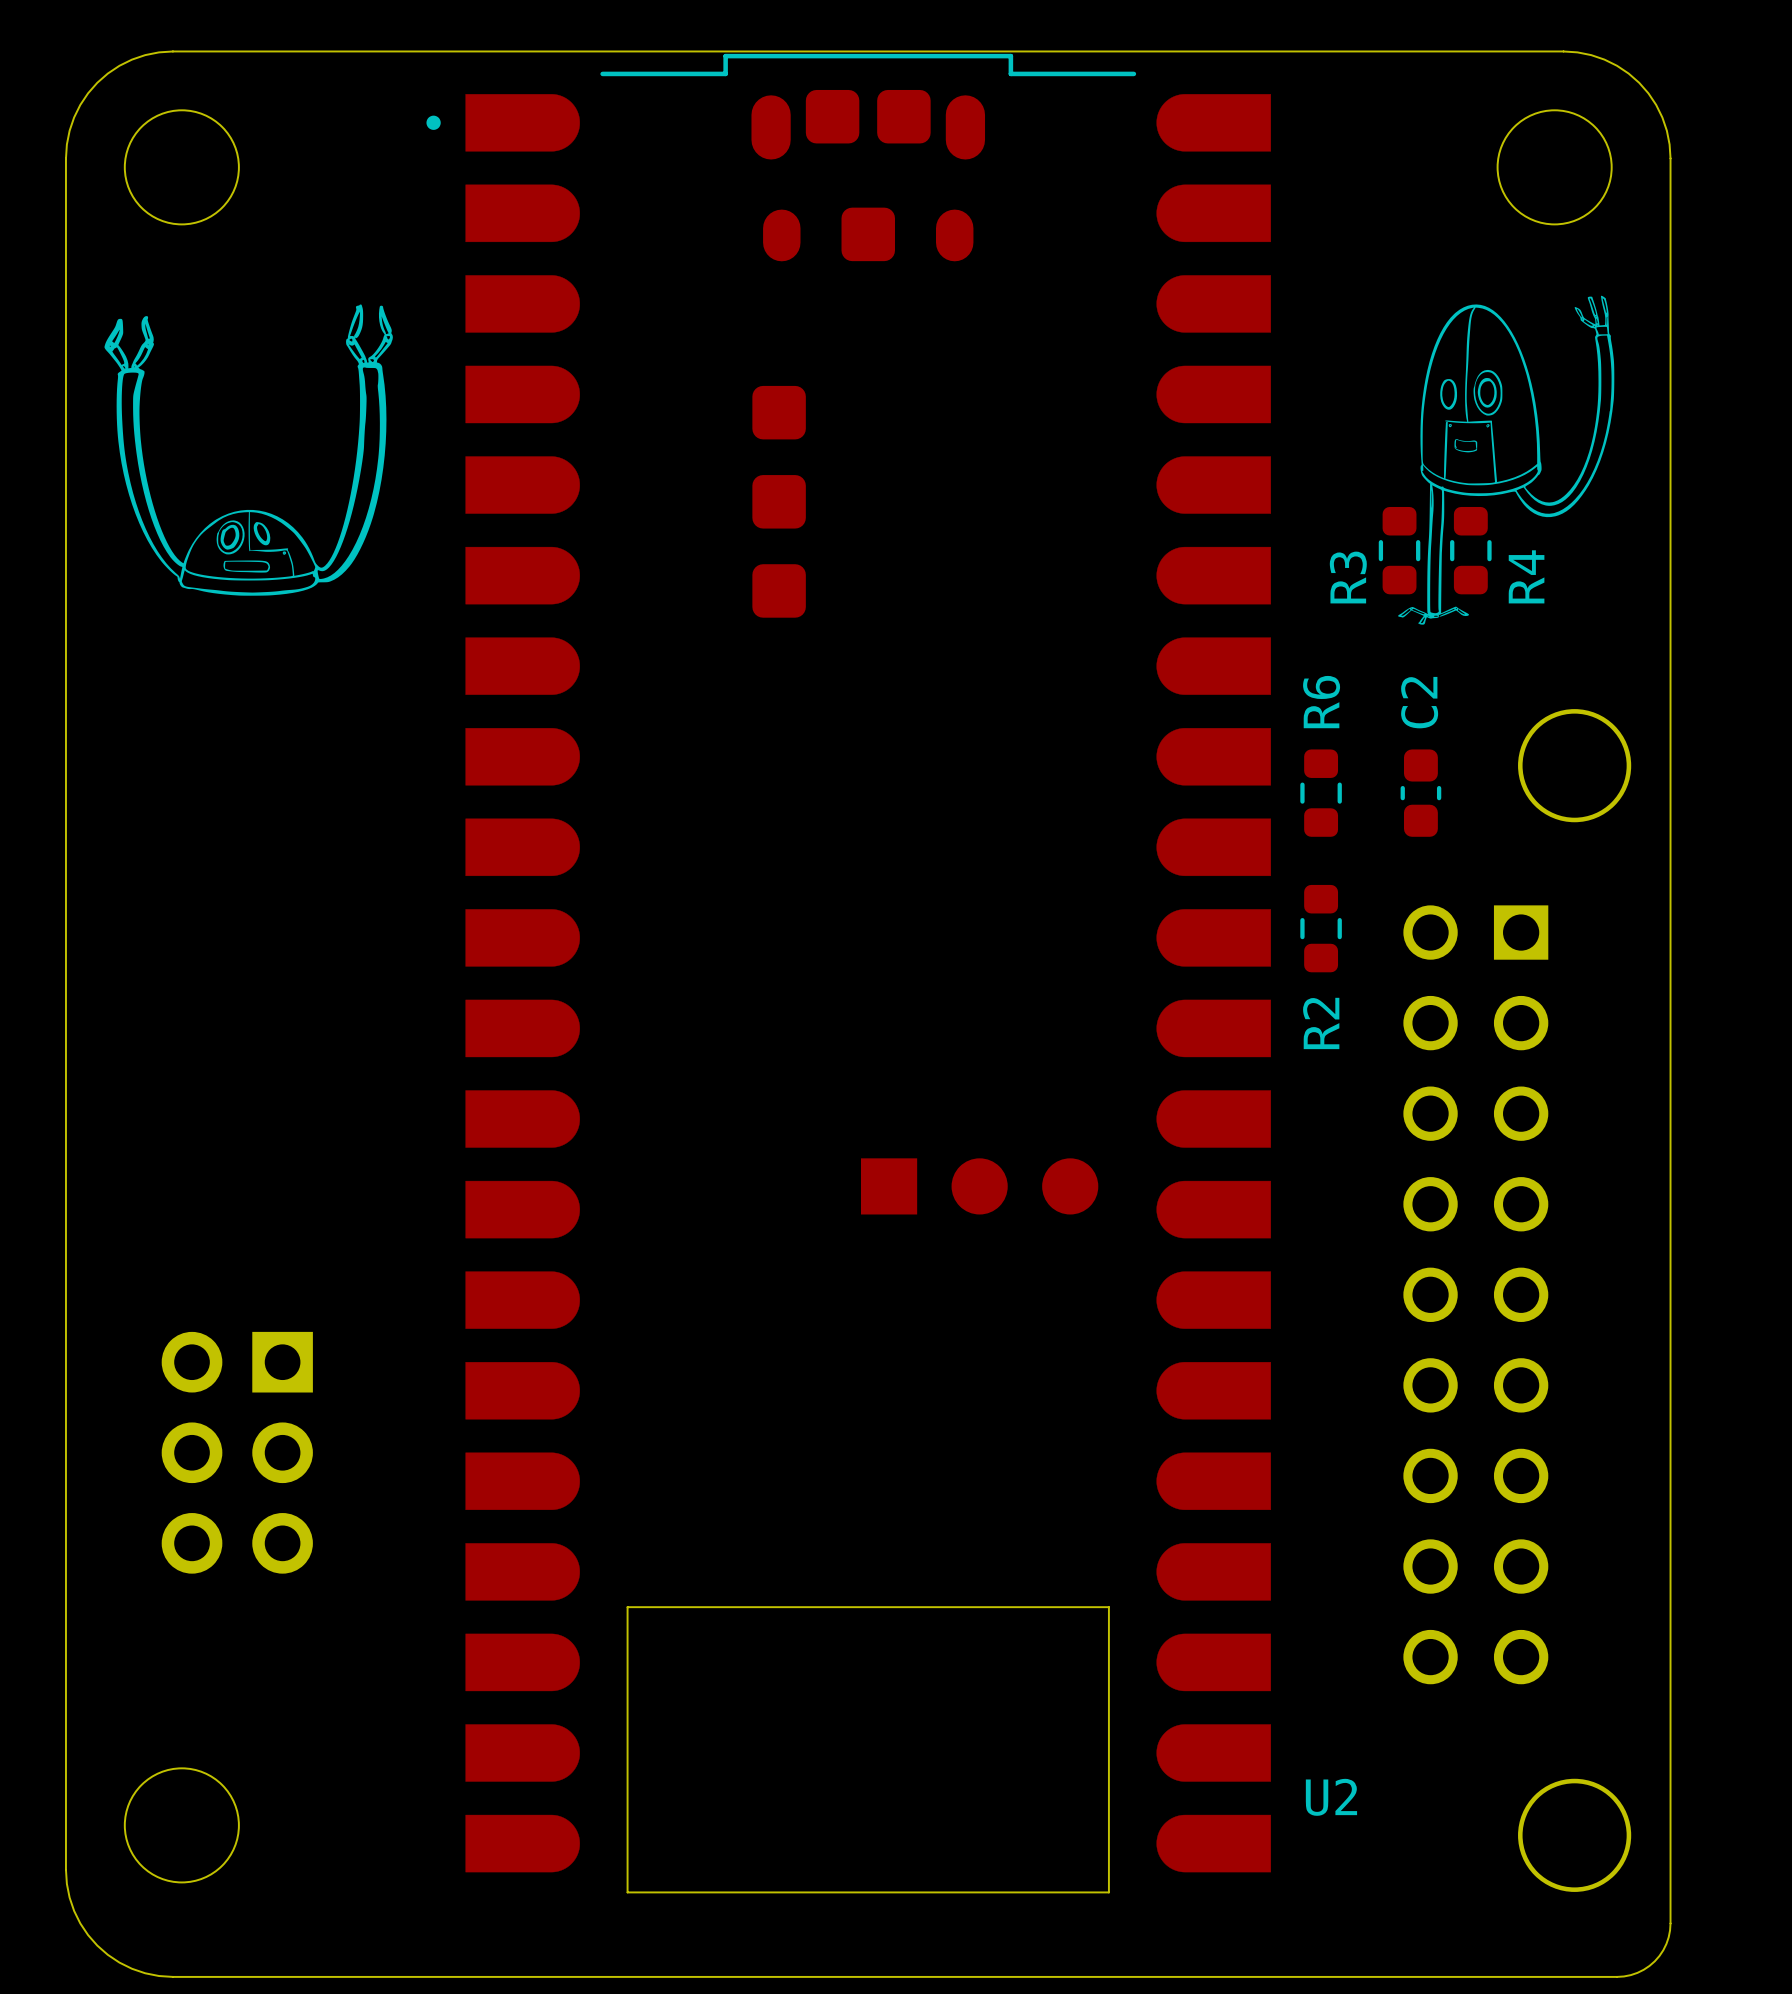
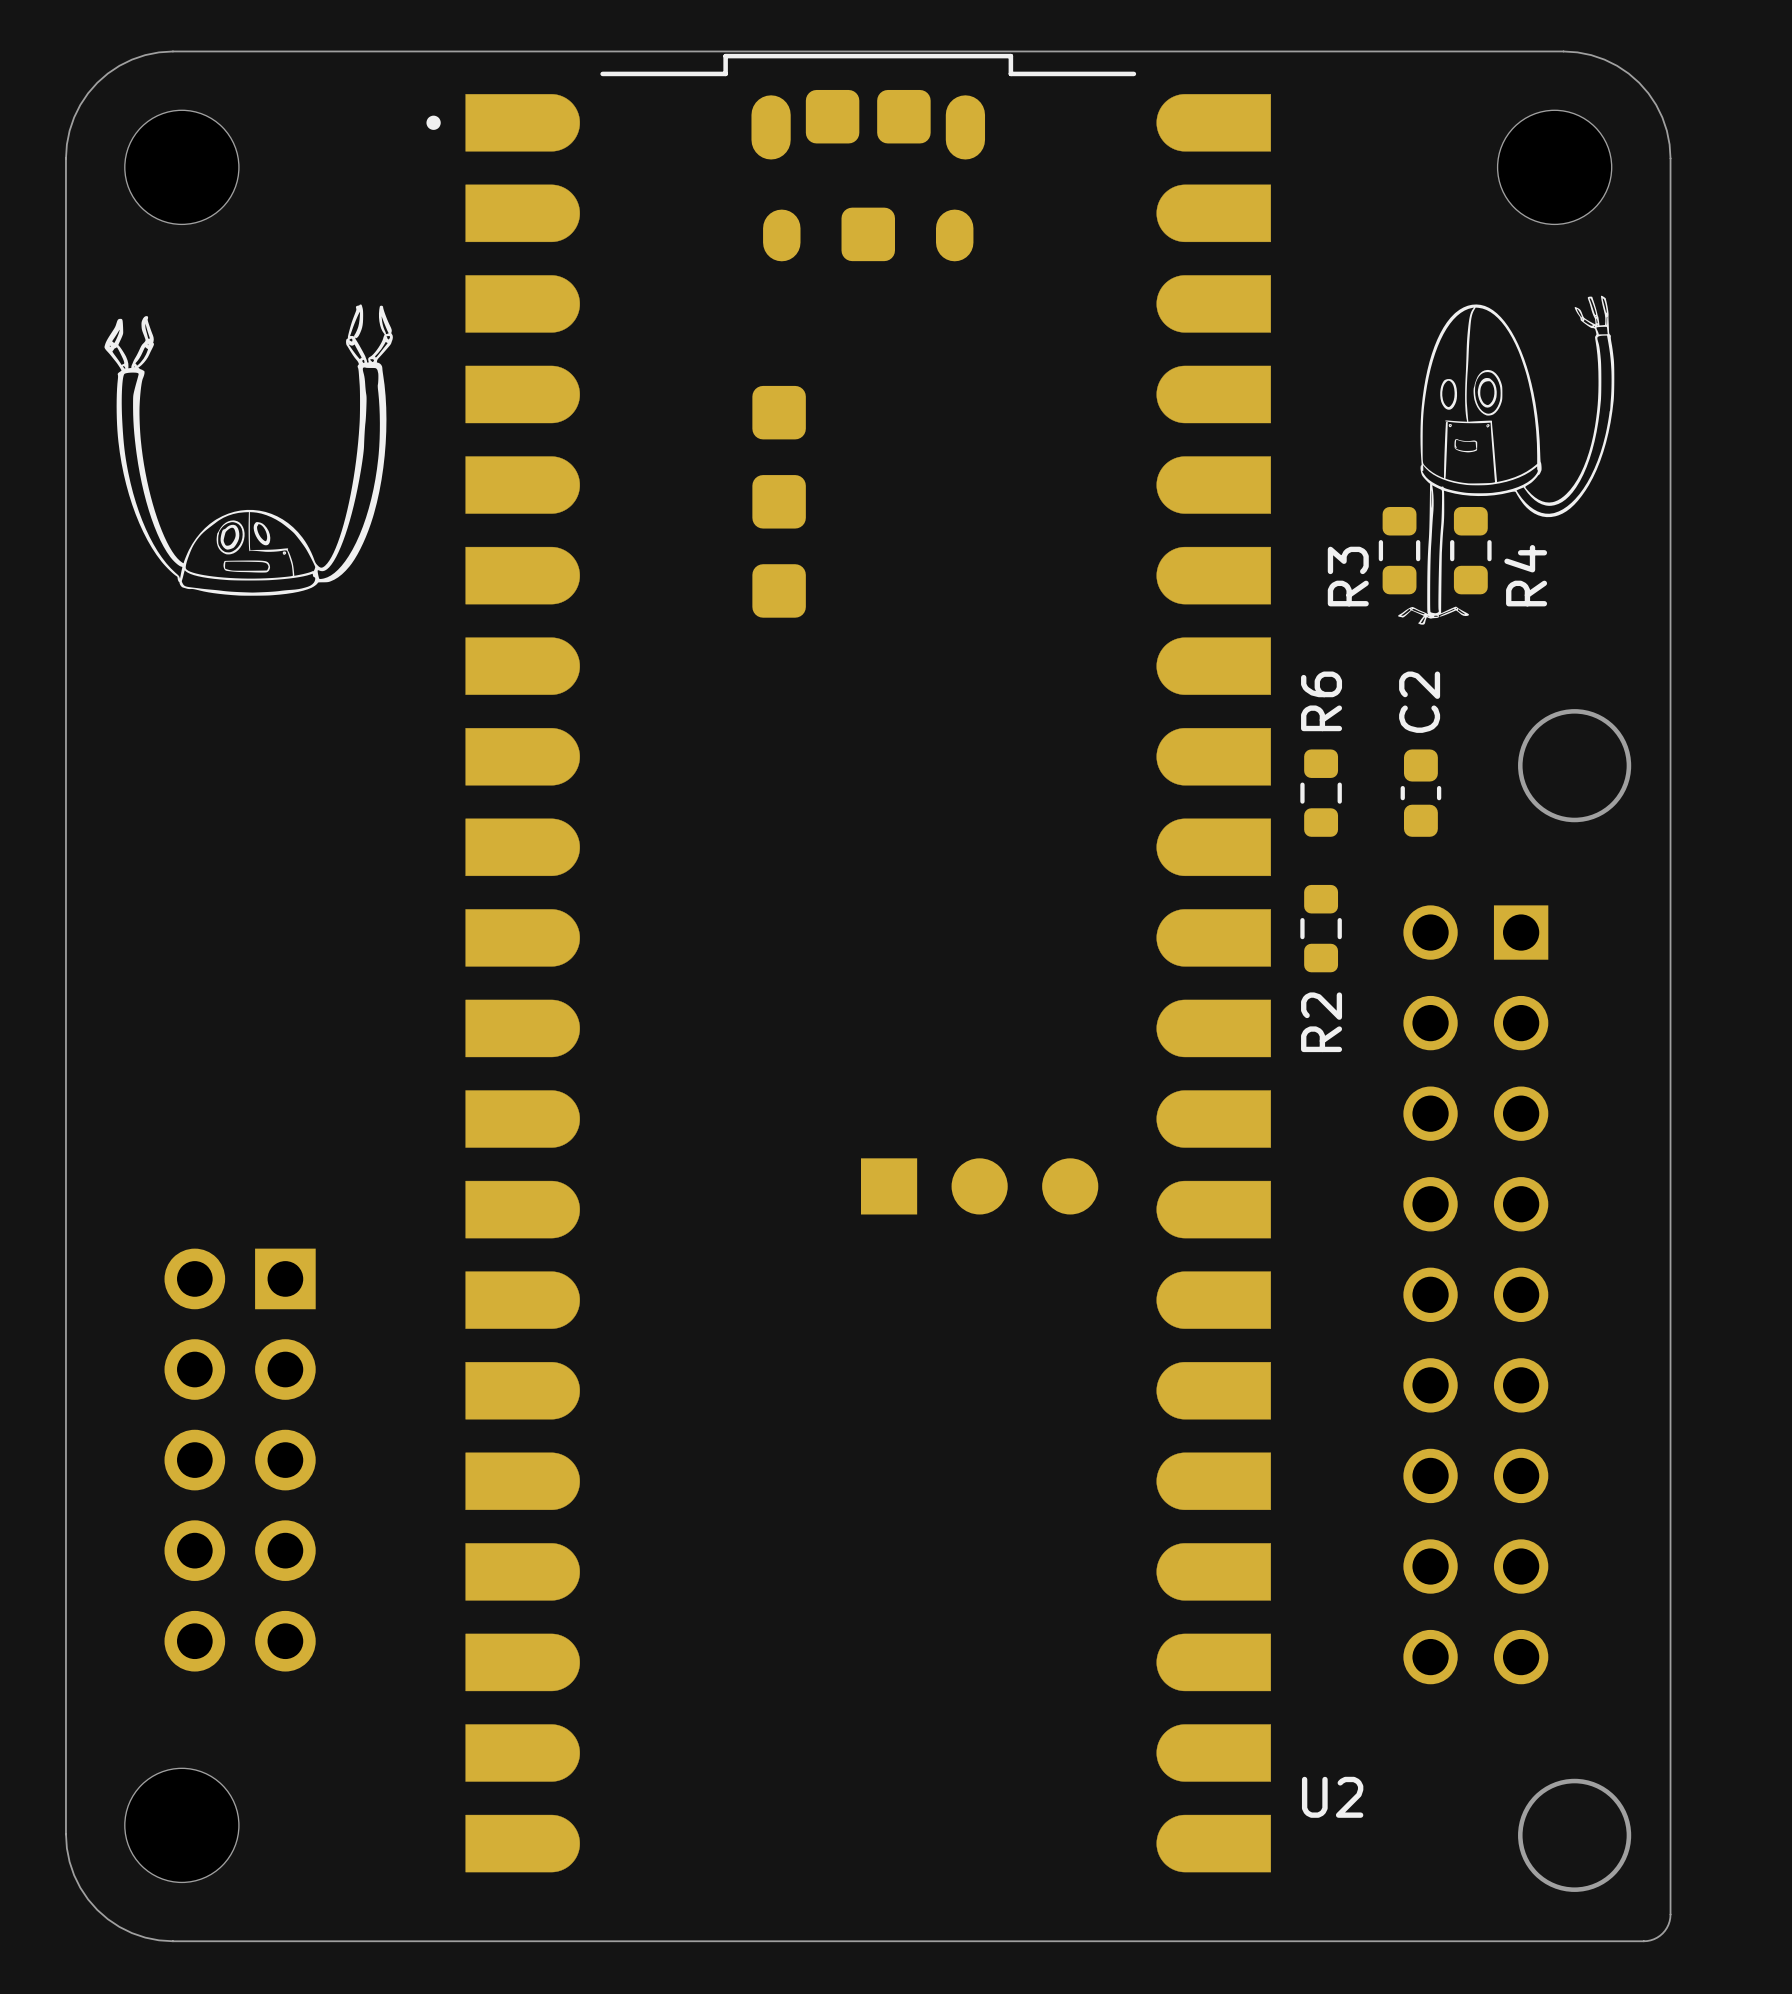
U2 footprint: [426, 53, 1271, 1893] -> [426, 53, 1271, 1873]
part footprint: [161, 1331, 313, 1574] -> [164, 1248, 316, 1672]
board edge: (65, 1834) (65, 1869) (69, 1897) (80, 1923) (88, 1935) (107, 1954) (119, 1962) (145, 1973) (172, 1976) (1617, 1976) (1630, 1975) (1643, 1969) (1659, 1955) (1668, 1937) (1670, 1914) -> (65, 1834) (66, 1848) (74, 1875) (88, 1899) (97, 1909) (107, 1919) (132, 1933) (158, 1940) (172, 1941) (1643, 1941) (1654, 1939) (1662, 1933) (1668, 1924) (1670, 1914)

